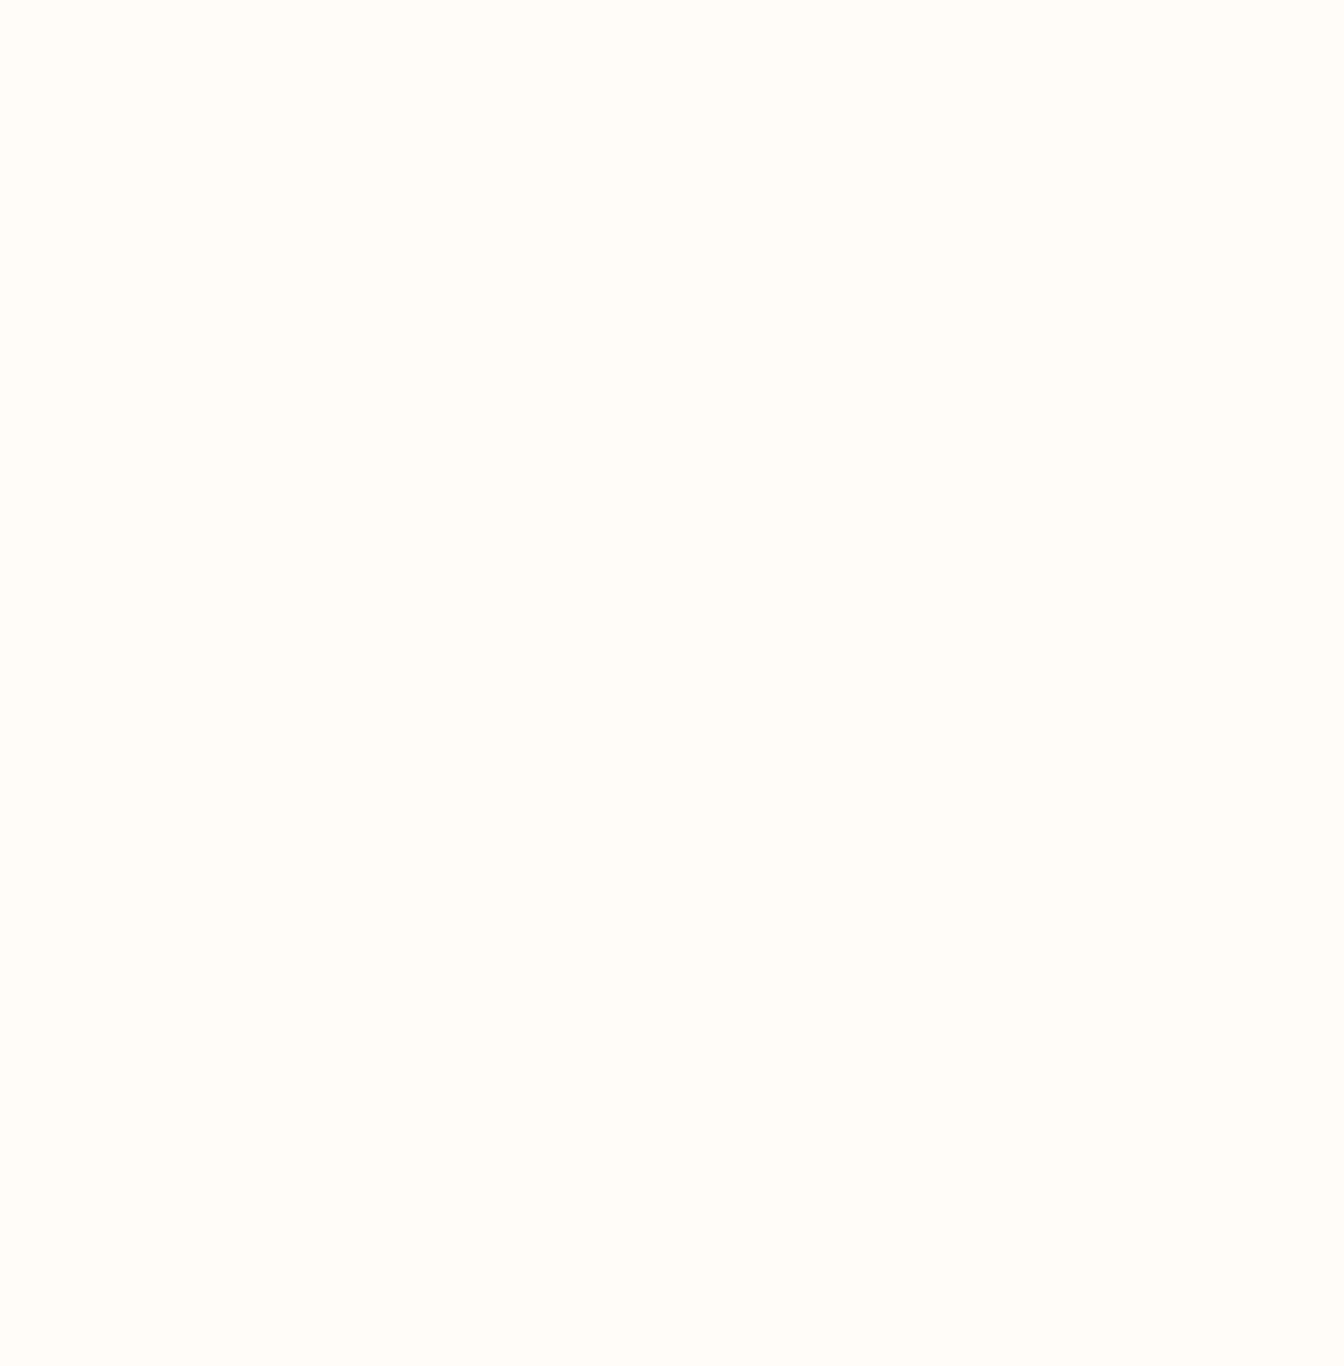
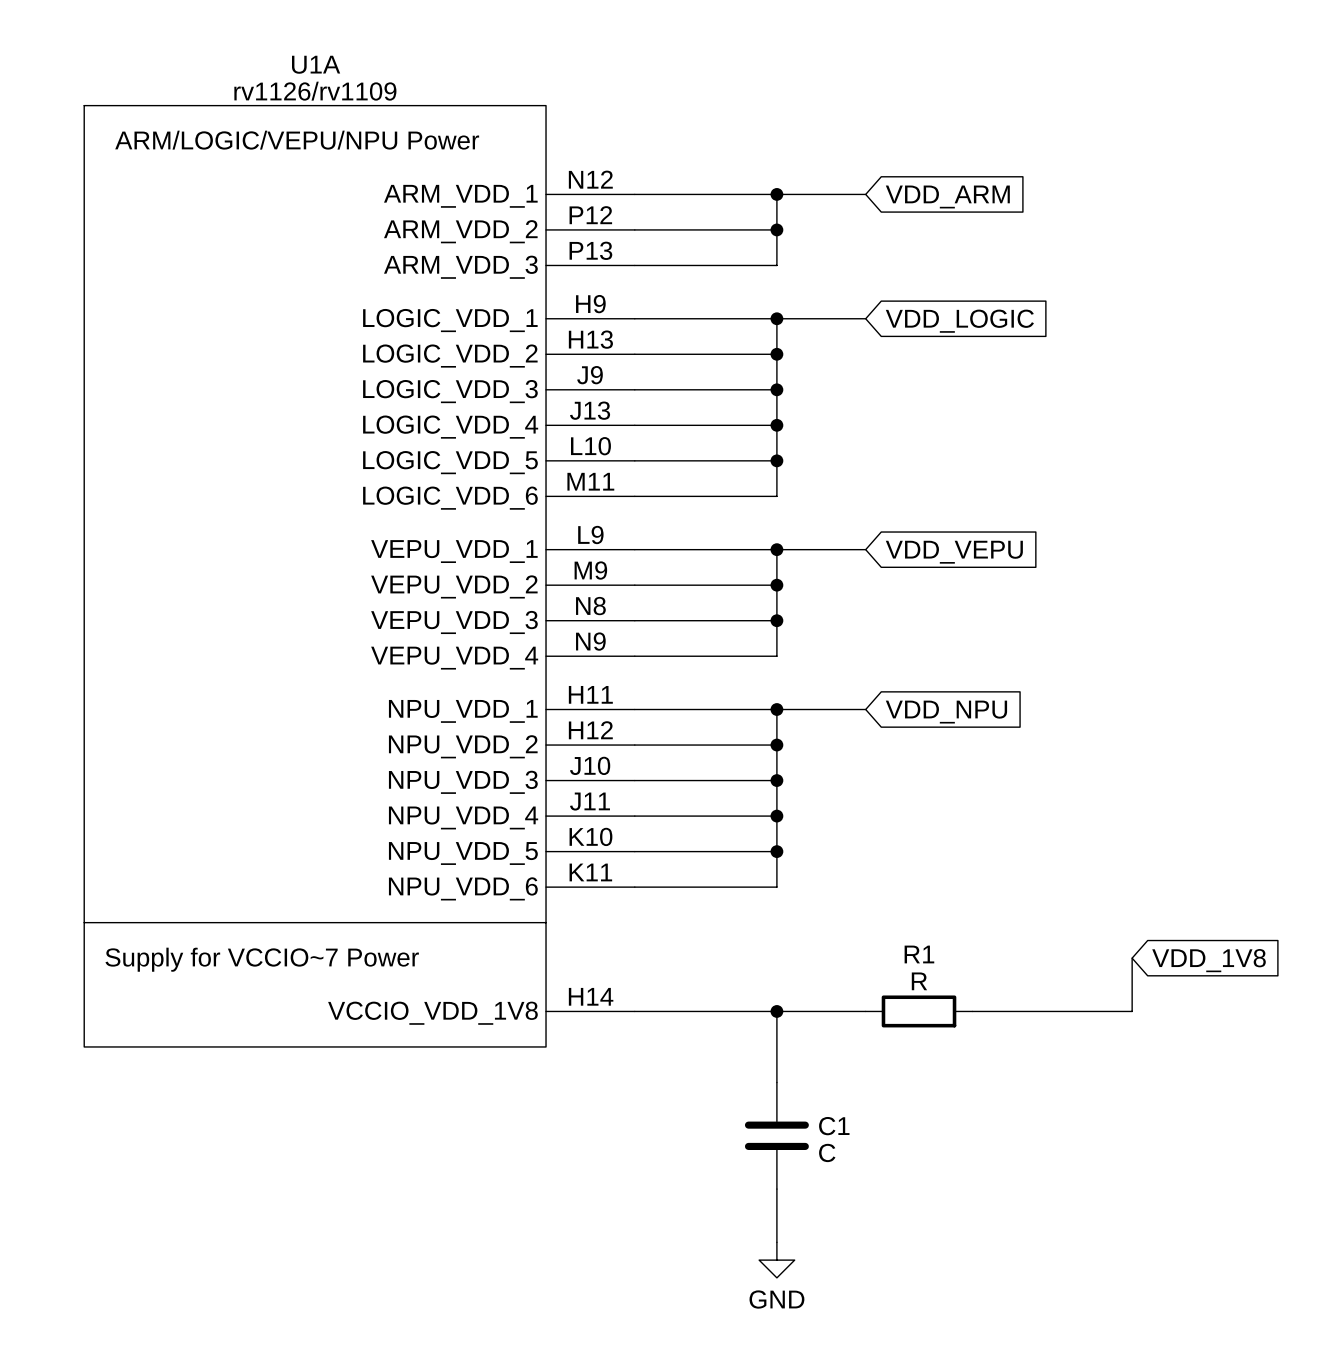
wire: none -> (634, 194) (865, 194)
wire: none -> (776, 194) (776, 265) (634, 265)
junction: none -> (776, 194)
global label: none -> VDD_ARM (947, 196)
wire: none -> (634, 229) (776, 229)
junction: none -> (776, 229)
wire: none -> (634, 318) (865, 318)
wire: none -> (776, 318) (776, 496) (634, 496)
junction: none -> (776, 318)
global label: none -> VDD_LOGIC (959, 321)
wire: none -> (634, 354) (776, 354)
junction: none -> (776, 354)
wire: none -> (634, 389) (776, 389)
junction: none -> (776, 389)
wire: none -> (634, 425) (776, 425)
junction: none -> (776, 425)
wire: none -> (634, 460) (776, 460)
junction: none -> (776, 460)
wire: none -> (634, 549) (865, 549)
wire: none -> (776, 549) (776, 656) (634, 656)
junction: none -> (776, 549)
global label: none -> VDD_VEPU (954, 552)
U1A: none -> rv1126/rv1109 (359, 576)
wire: none -> (634, 585) (776, 585)
junction: none -> (776, 585)
wire: none -> (634, 620) (776, 620)
junction: none -> (776, 620)
wire: none -> (634, 709) (865, 709)
wire: none -> (776, 709) (776, 887) (634, 887)
junction: none -> (776, 709)
global label: none -> VDD_NPU (946, 712)
wire: none -> (634, 745) (776, 745)
junction: none -> (776, 745)
wire: none -> (634, 780) (776, 780)
junction: none -> (776, 780)
wire: none -> (634, 816) (776, 816)
junction: none -> (776, 816)
wire: none -> (634, 851) (776, 851)
junction: none -> (776, 851)
wire: none -> (1132, 958) (1132, 1011) (972, 1011)
global label: none -> VDD_1V8 (1209, 960)
wire: none -> (634, 1011) (865, 1011)
wire: none -> (776, 1011) (776, 1082)
junction: none -> (776, 1011)
R1: none -> R (919, 1011)
C1: none -> C (776, 1135)
wire: none -> (776, 1189) (776, 1242)
power symbol: none -> GND (776, 1260)

